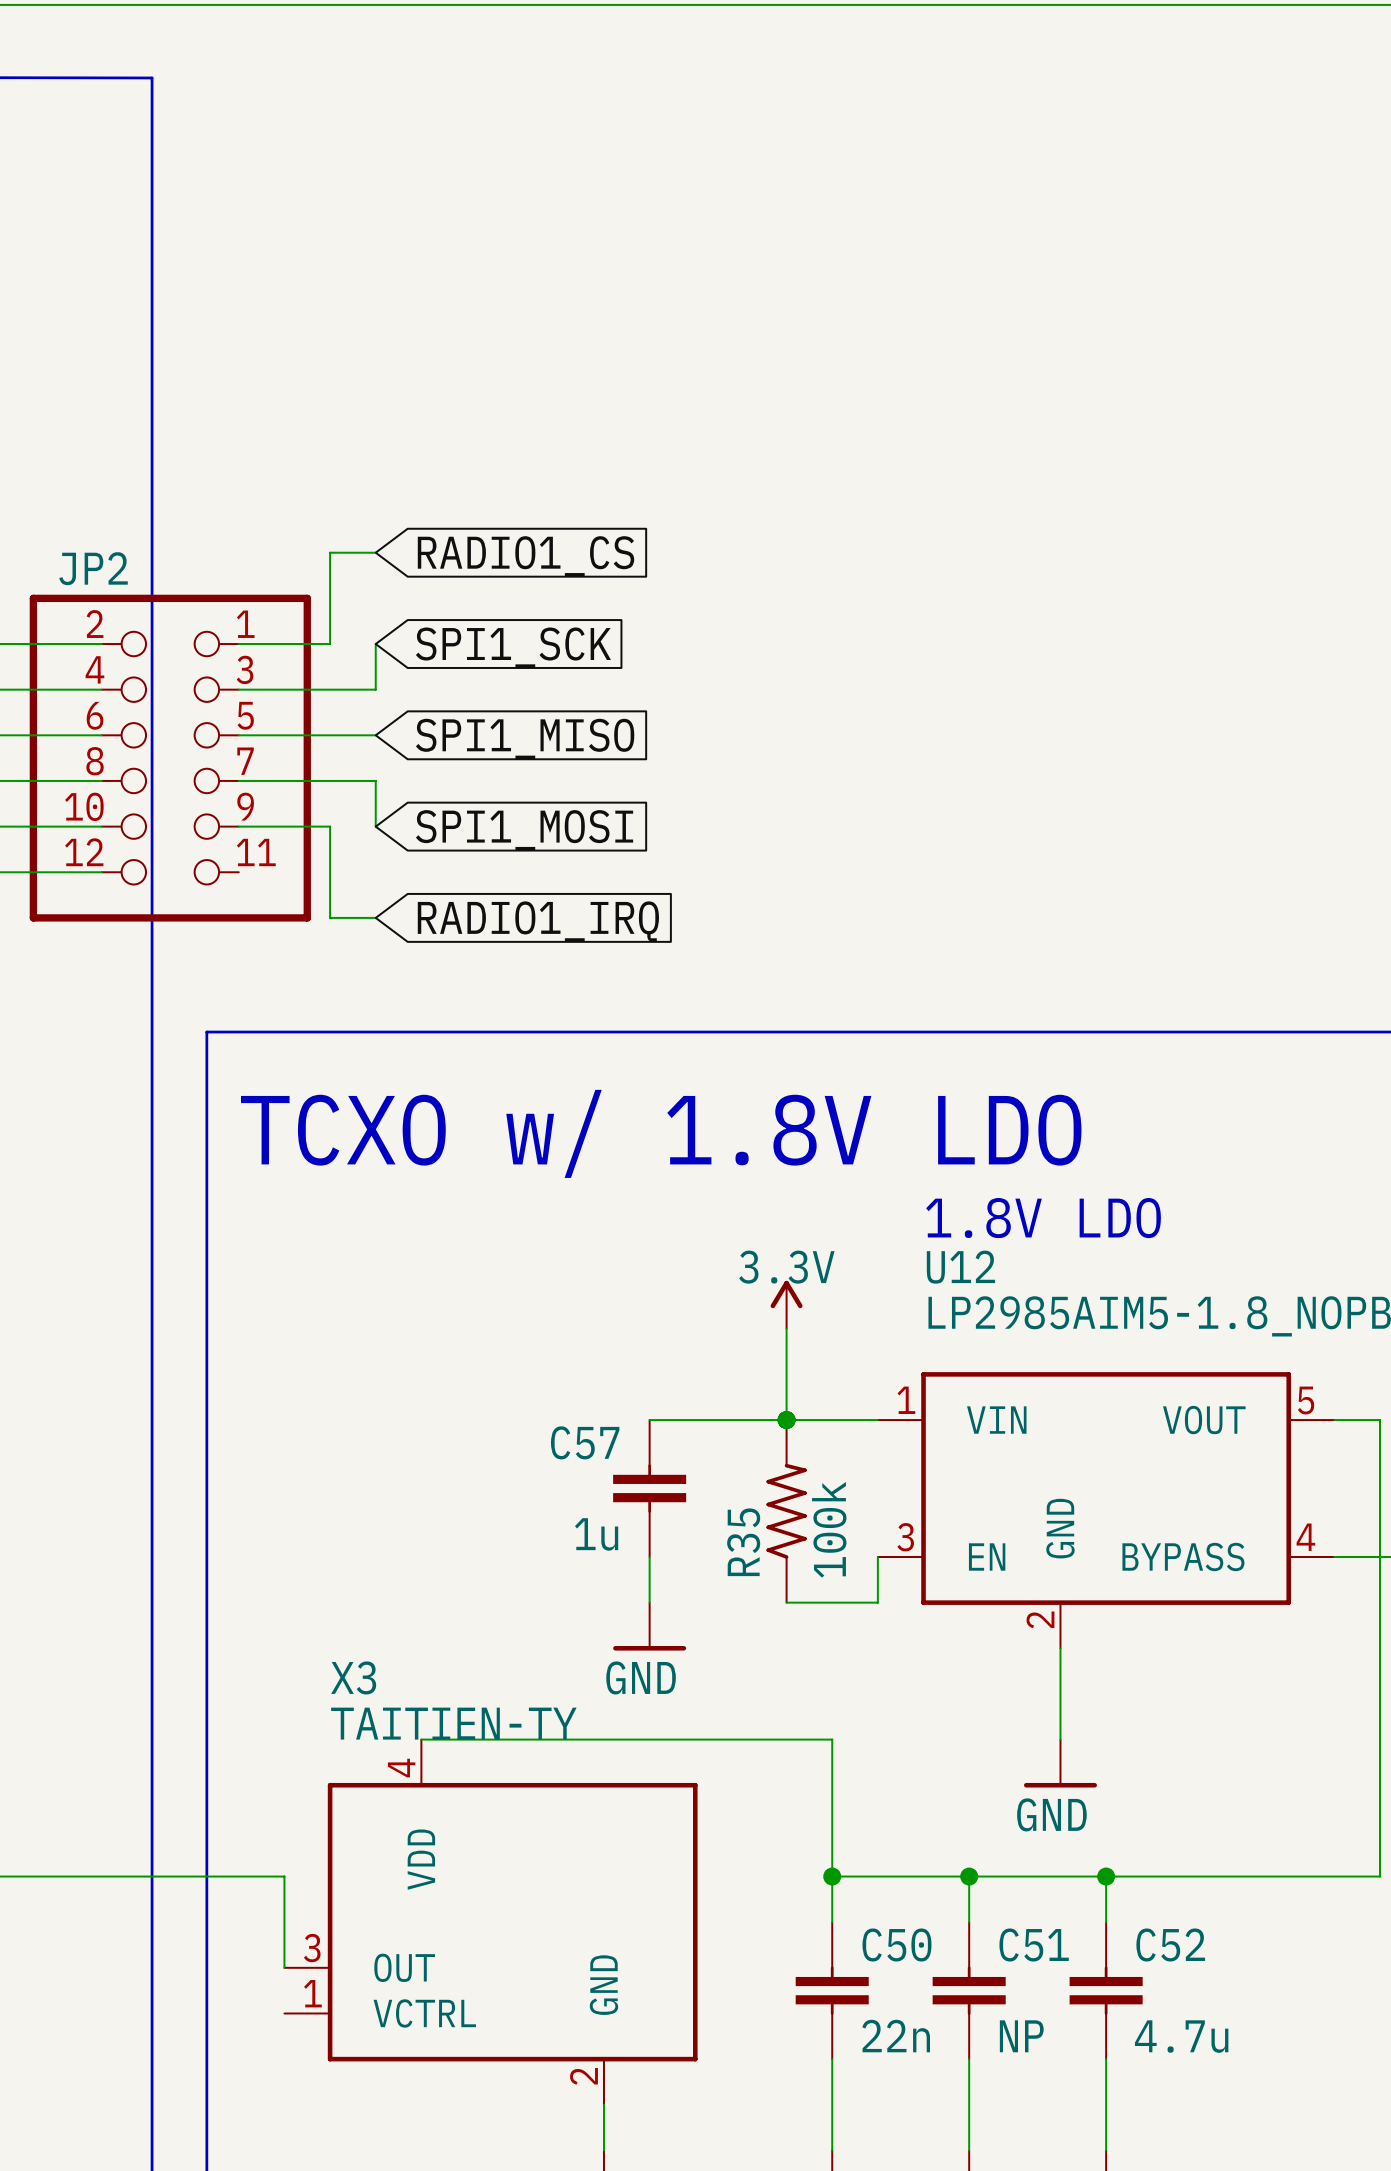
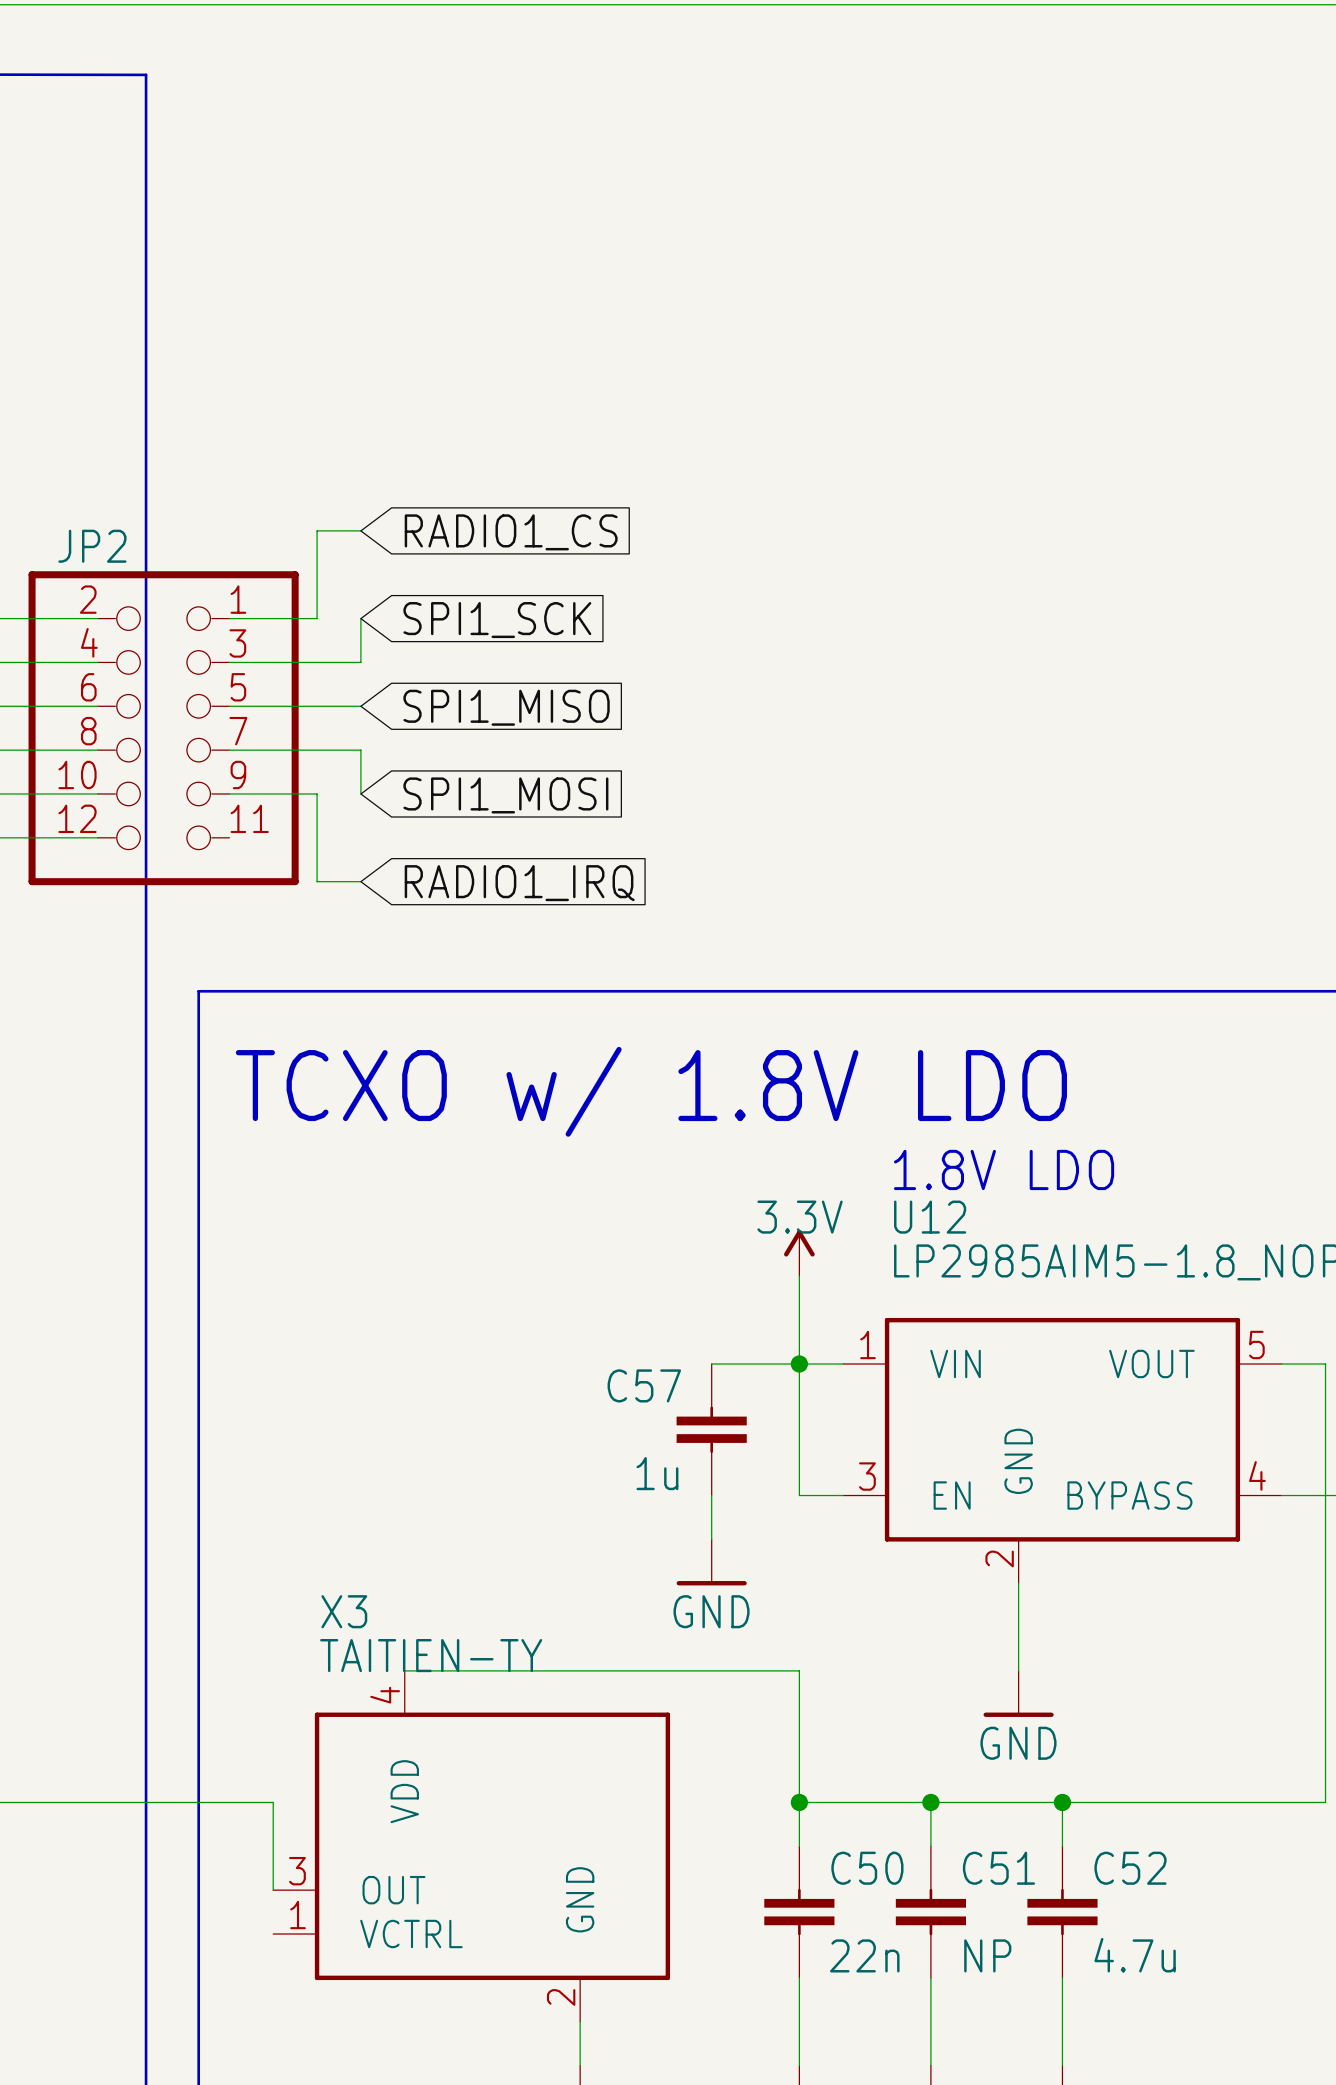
power symbol position: 3.3V (786, 1304) -> 3.3V (799, 1253)
wire: (786, 1328) (786, 1420) -> none
wire: (649, 1420) (740, 1420) -> none
junction position: (786, 1420) -> (799, 1363)
C57 position: (649, 1488) -> (711, 1429)
R35: 100k (786, 1511) -> none
wire: (649, 1556) (649, 1602) -> (711, 1495) (711, 1539)
wire: (877, 1556) (877, 1602) (786, 1602) -> (843, 1495) (799, 1495) (799, 1276)
power symbol position: GND (649, 1626) -> GND (711, 1562)

